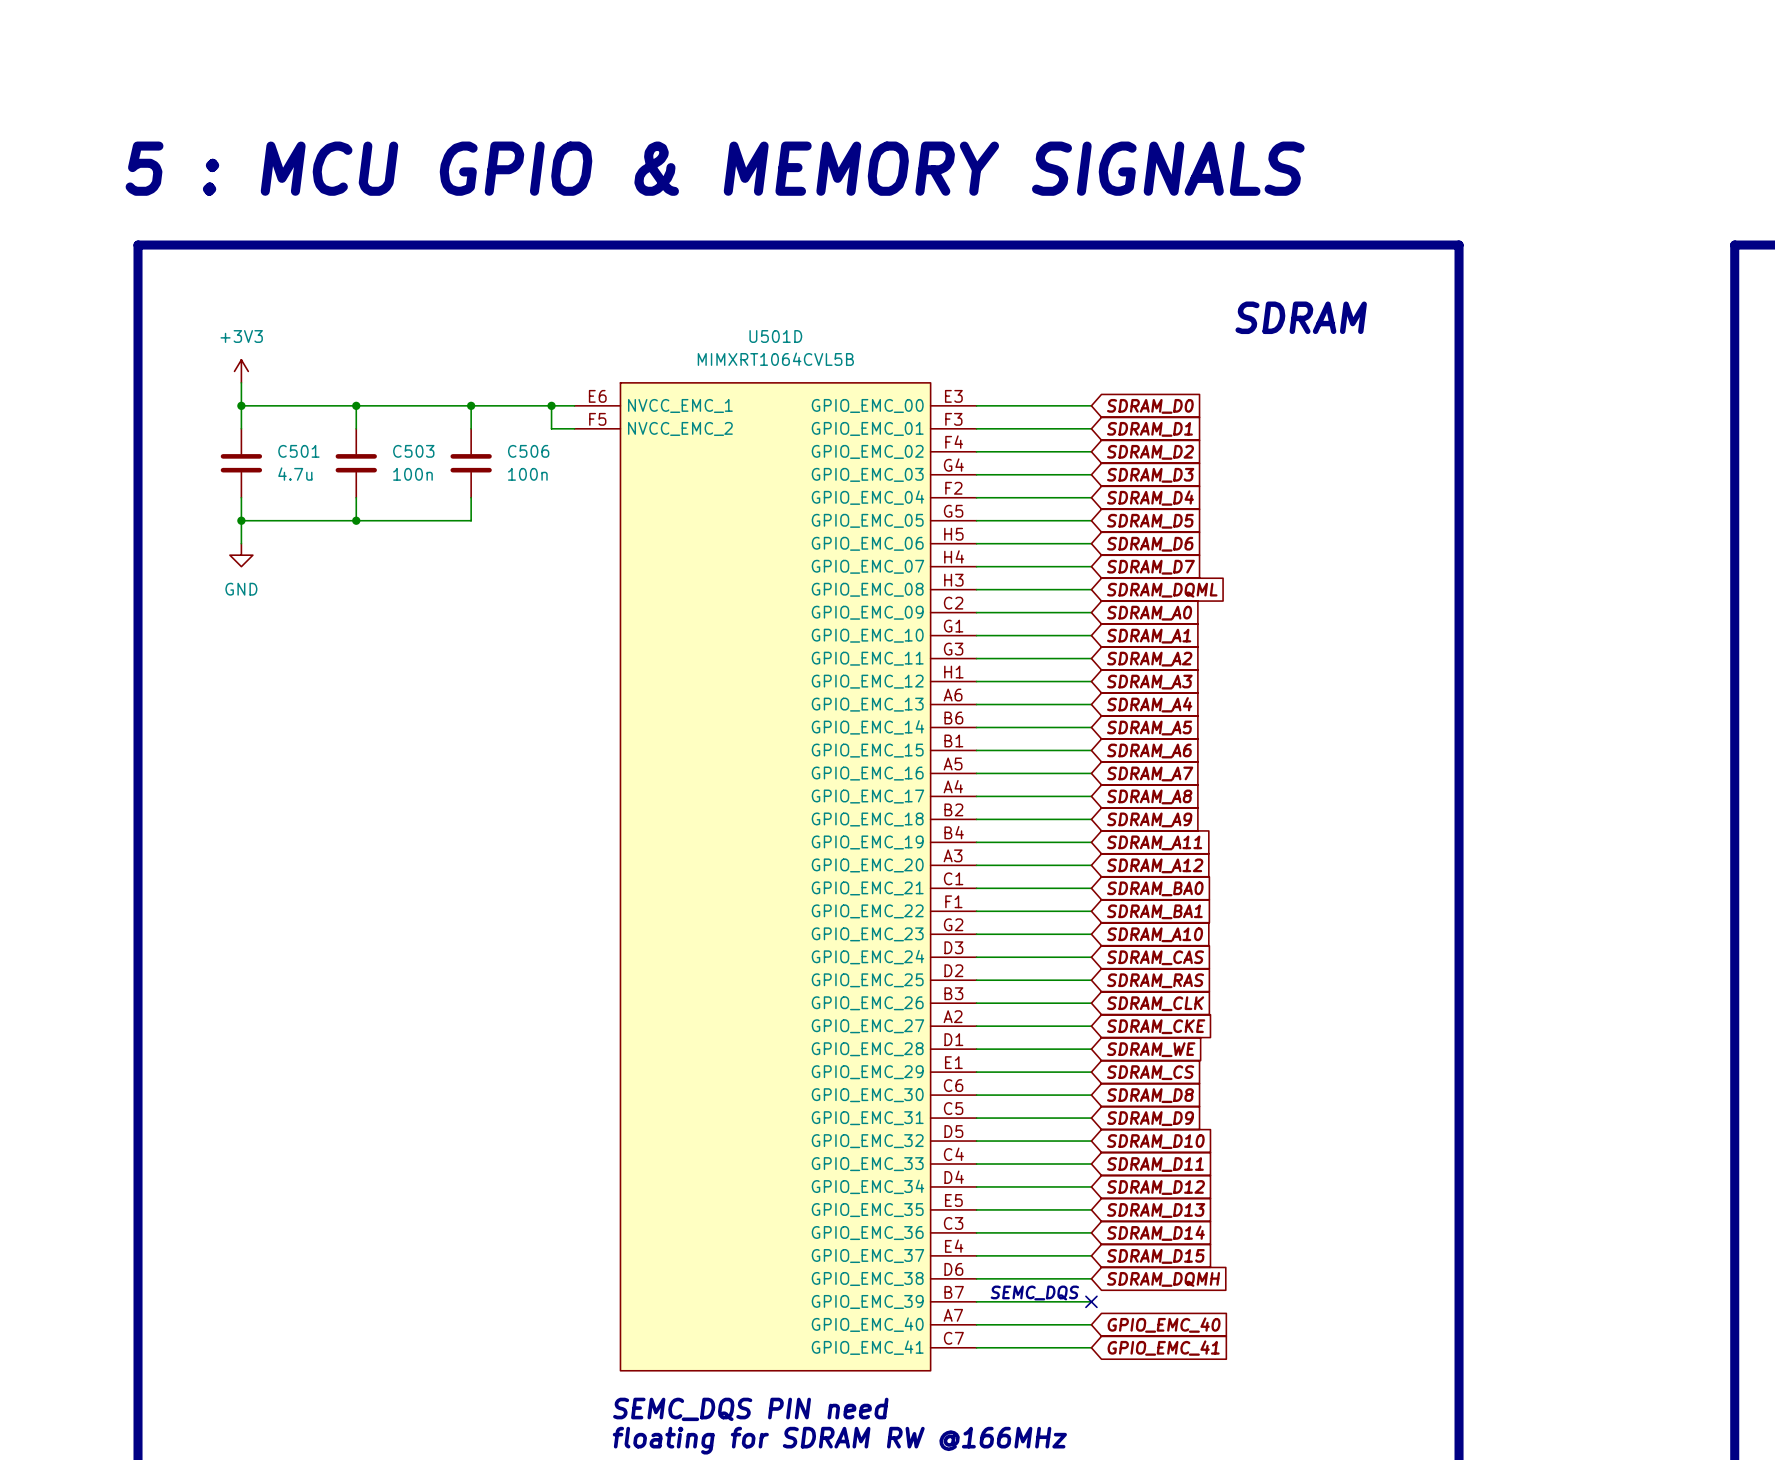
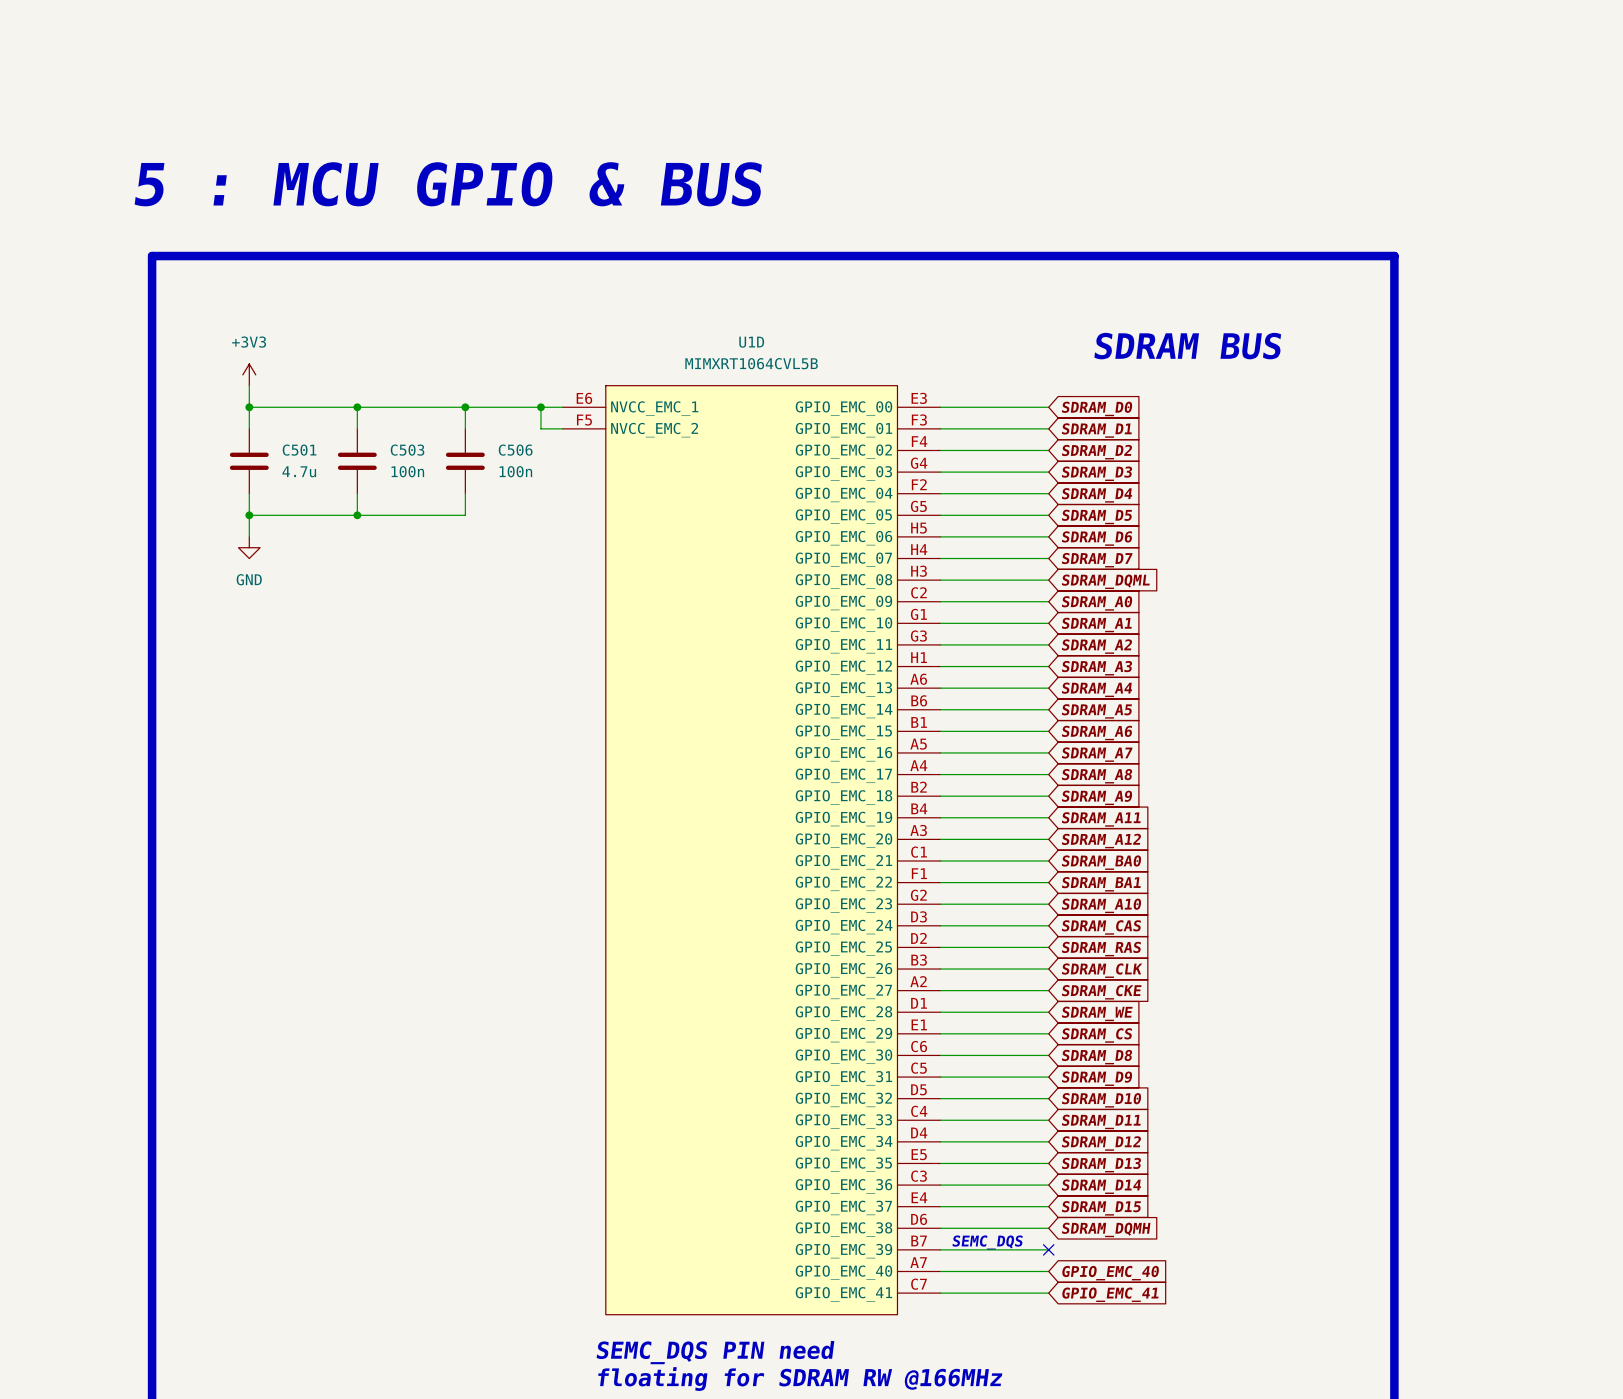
text: 5 : MCU GPIO & MEMORY SIGNALS (715, 168) -> 5 : MCU GPIO & BUS (448, 184)
text: SDRAM (1301, 317) -> SDRAM BUS (1187, 346)
U501D name: U501D (775, 336) -> U1D (751, 342)

